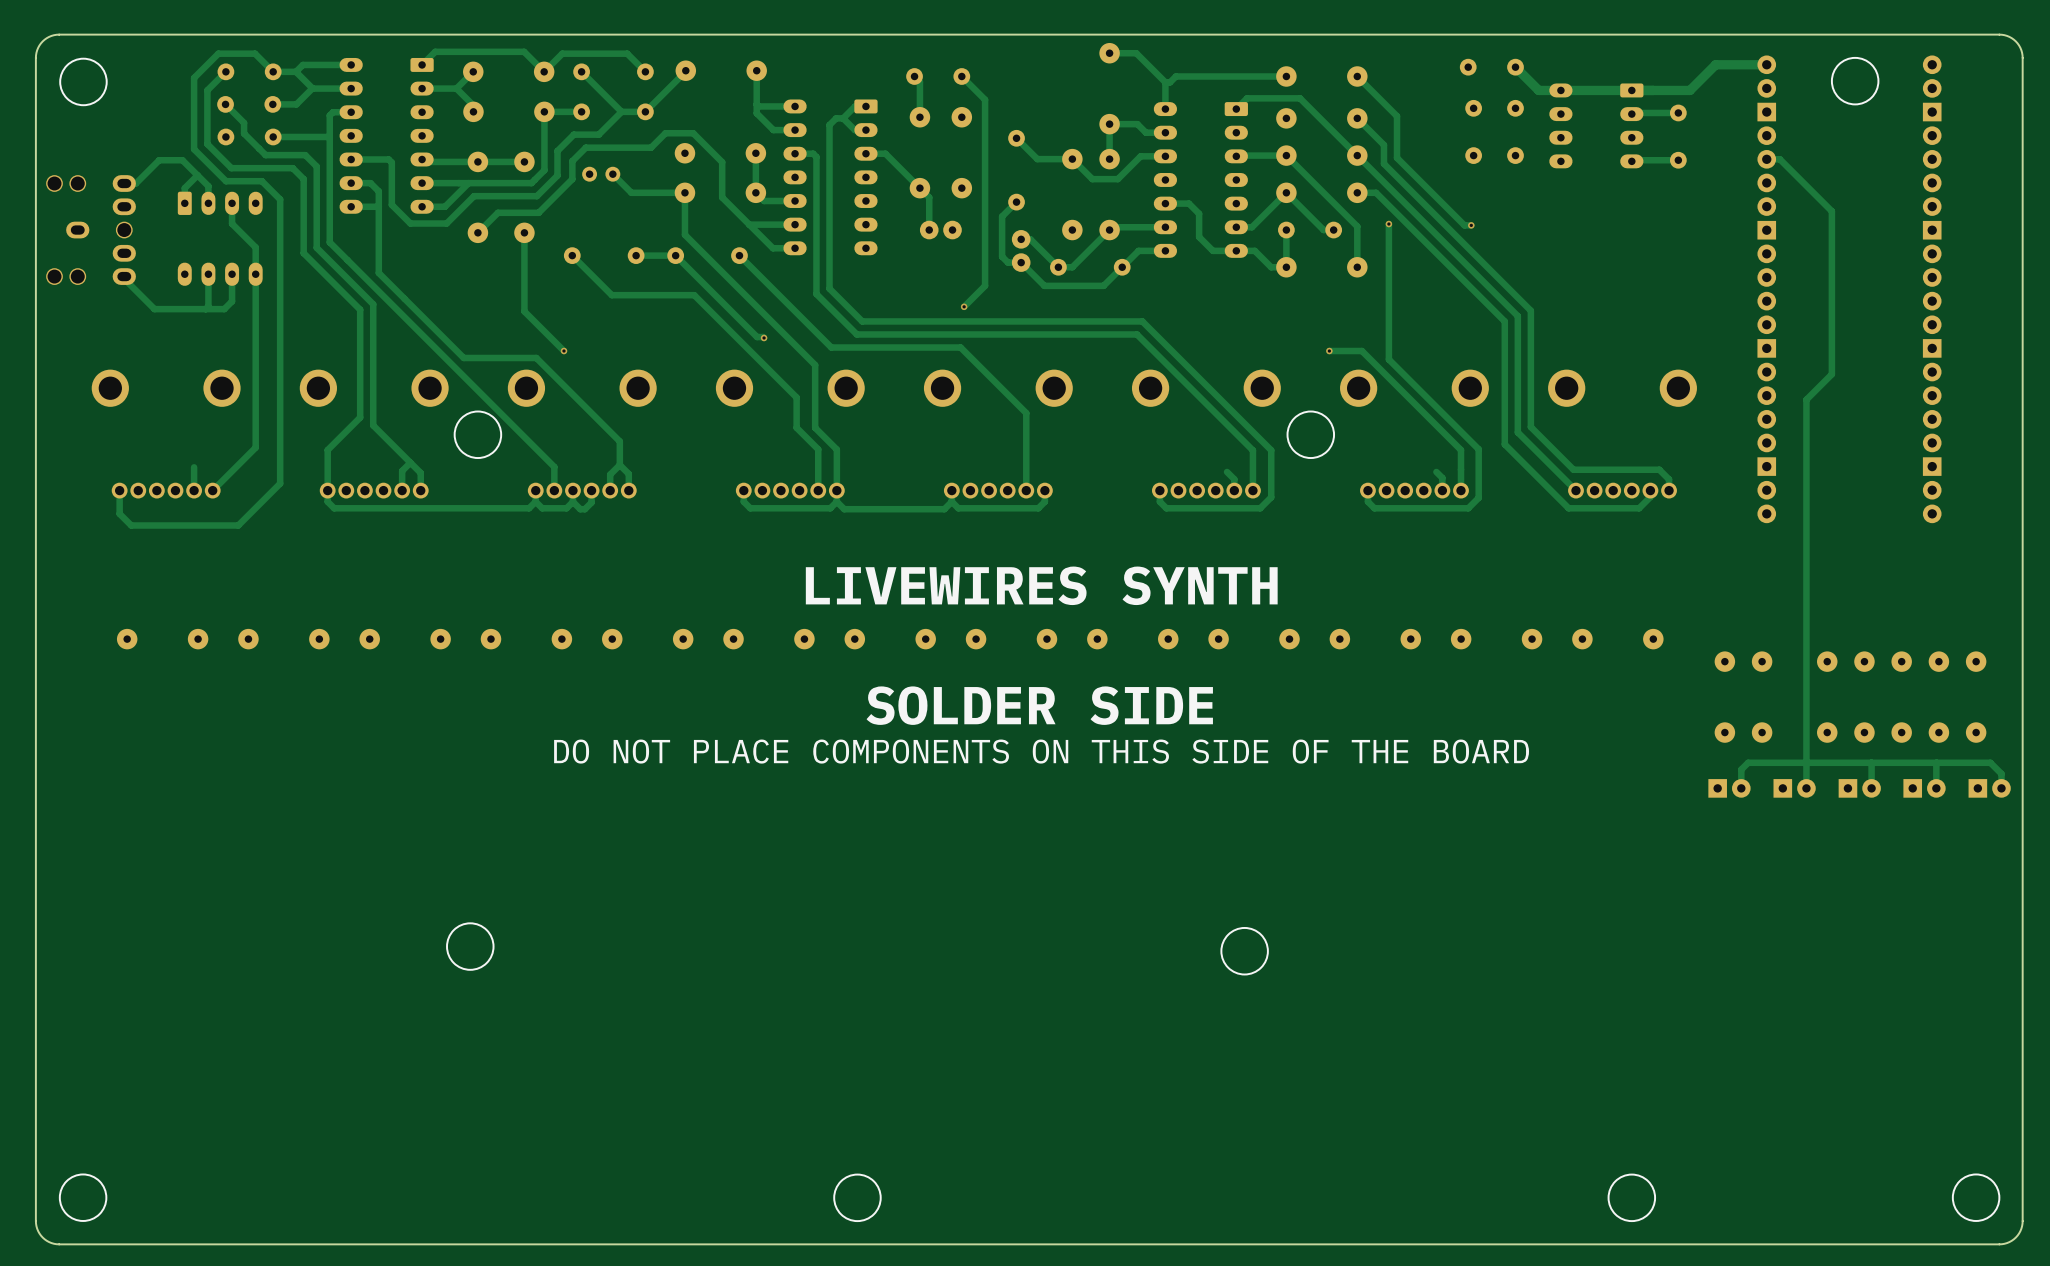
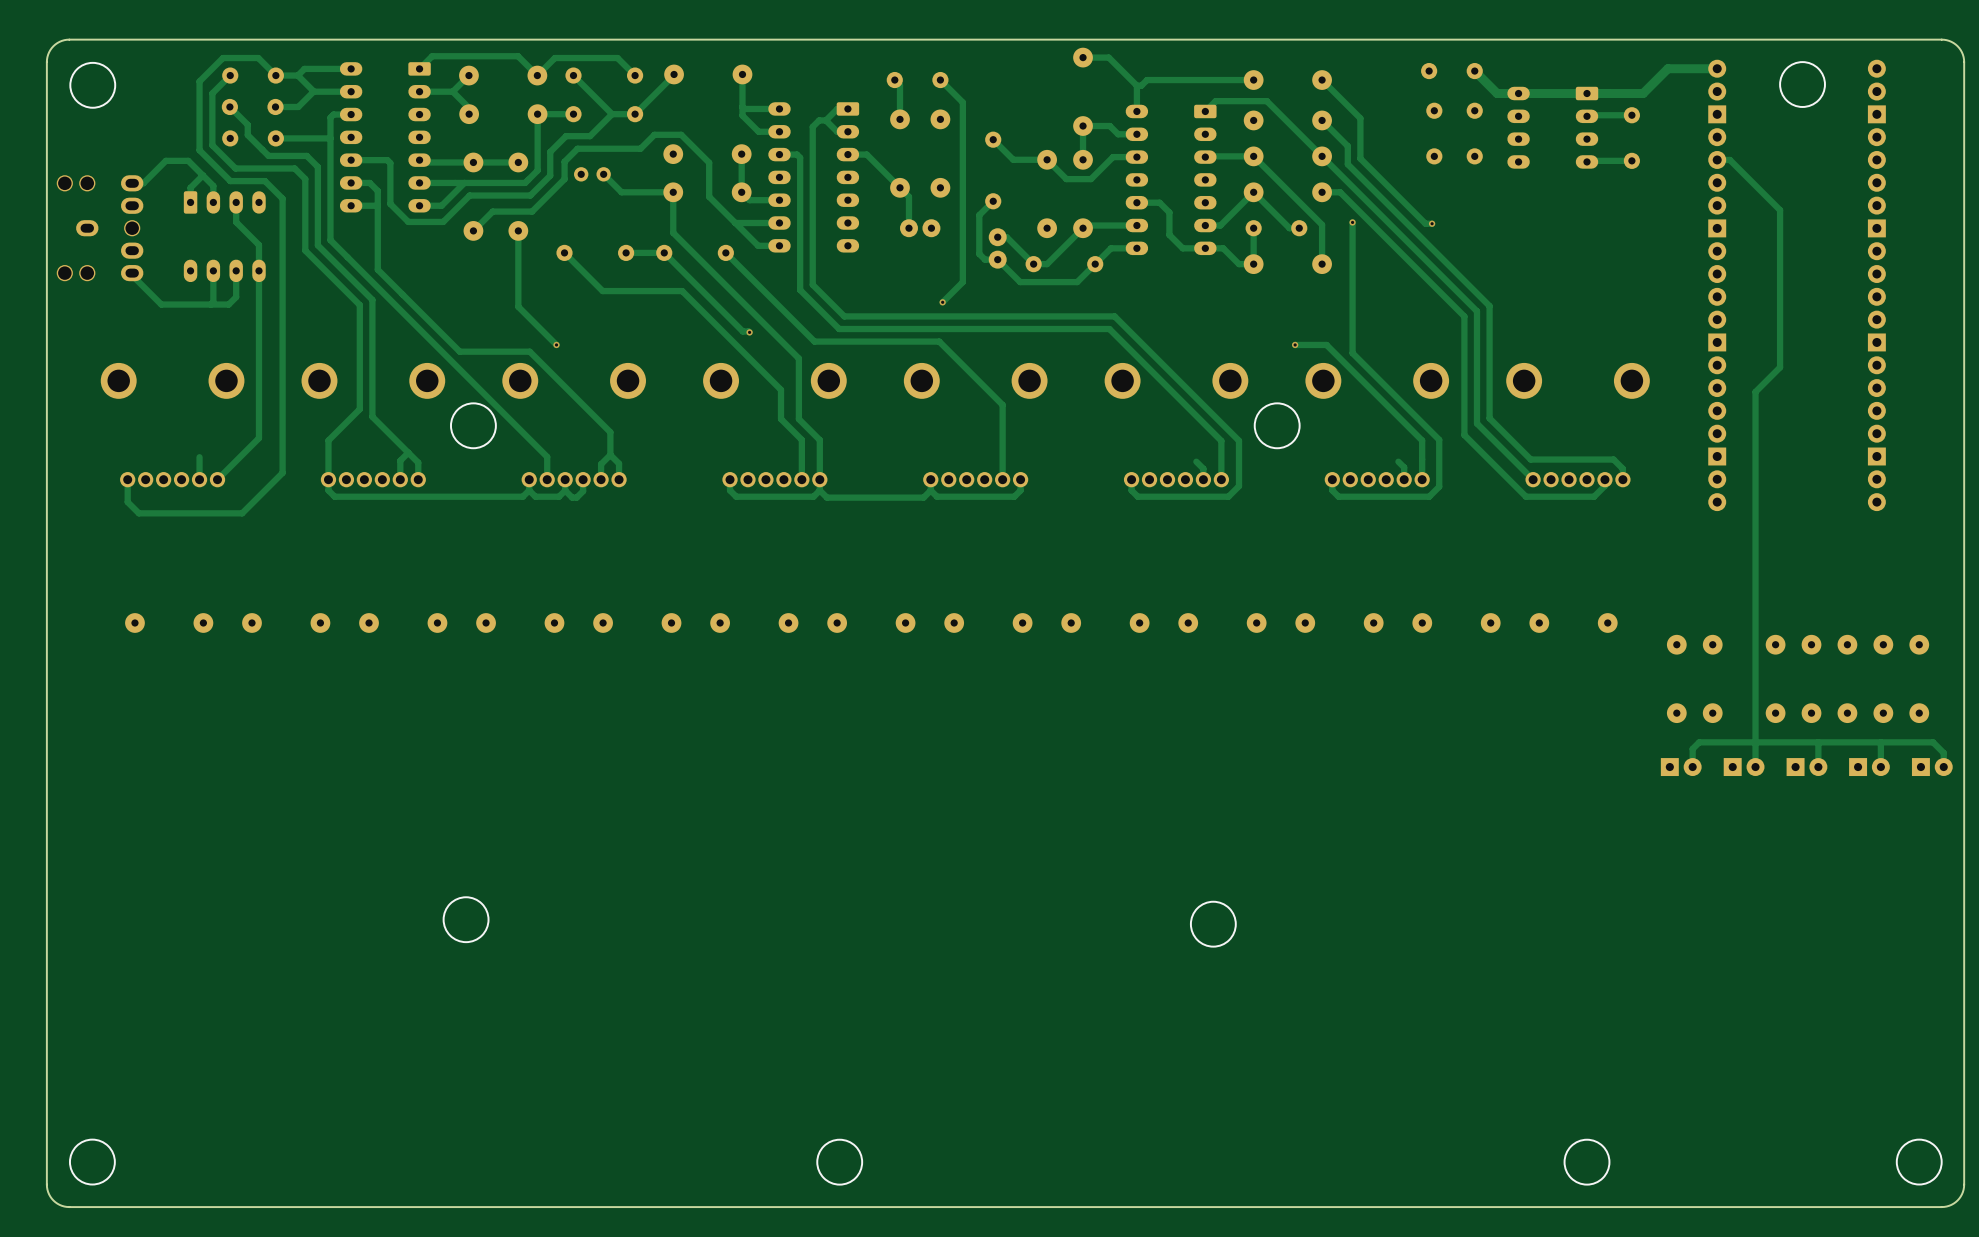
text: LIVEWIRES SYNTH (1041, 585) -> none
text: SOLDER SIDE (1039, 705) -> none
text: DO NOT PLACE COMPONENTS ON THIS SIDE OF THE BOARD (1041, 751) -> none

